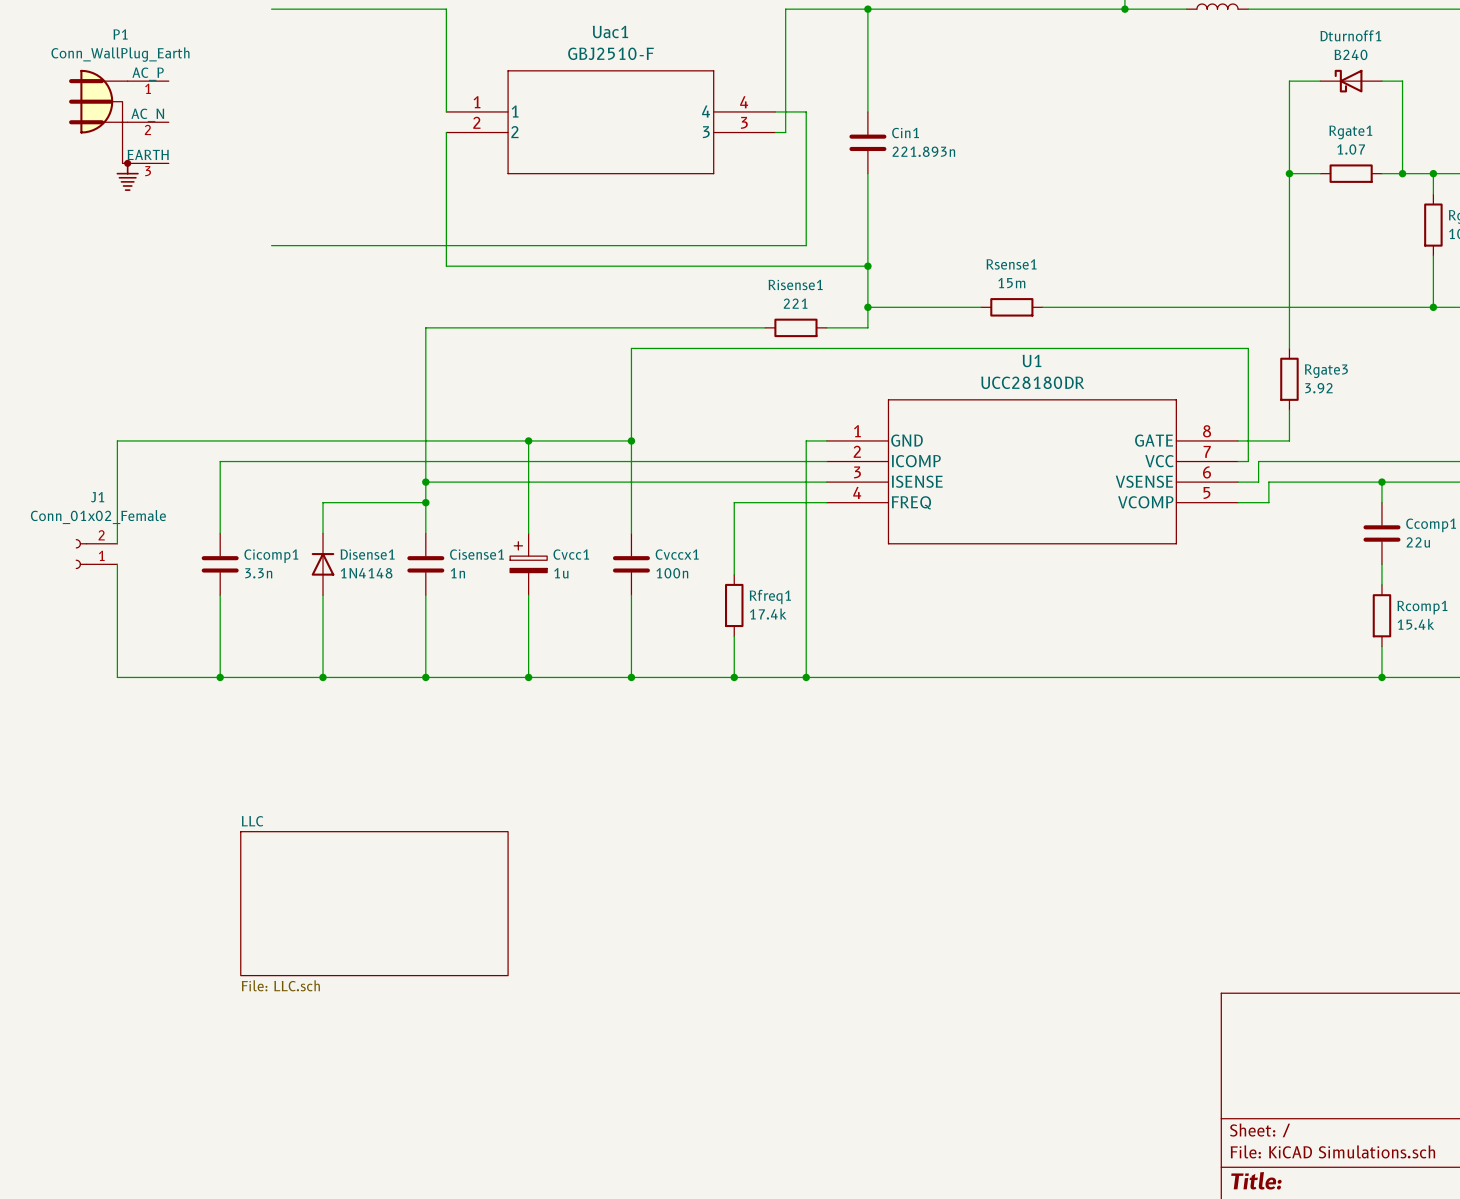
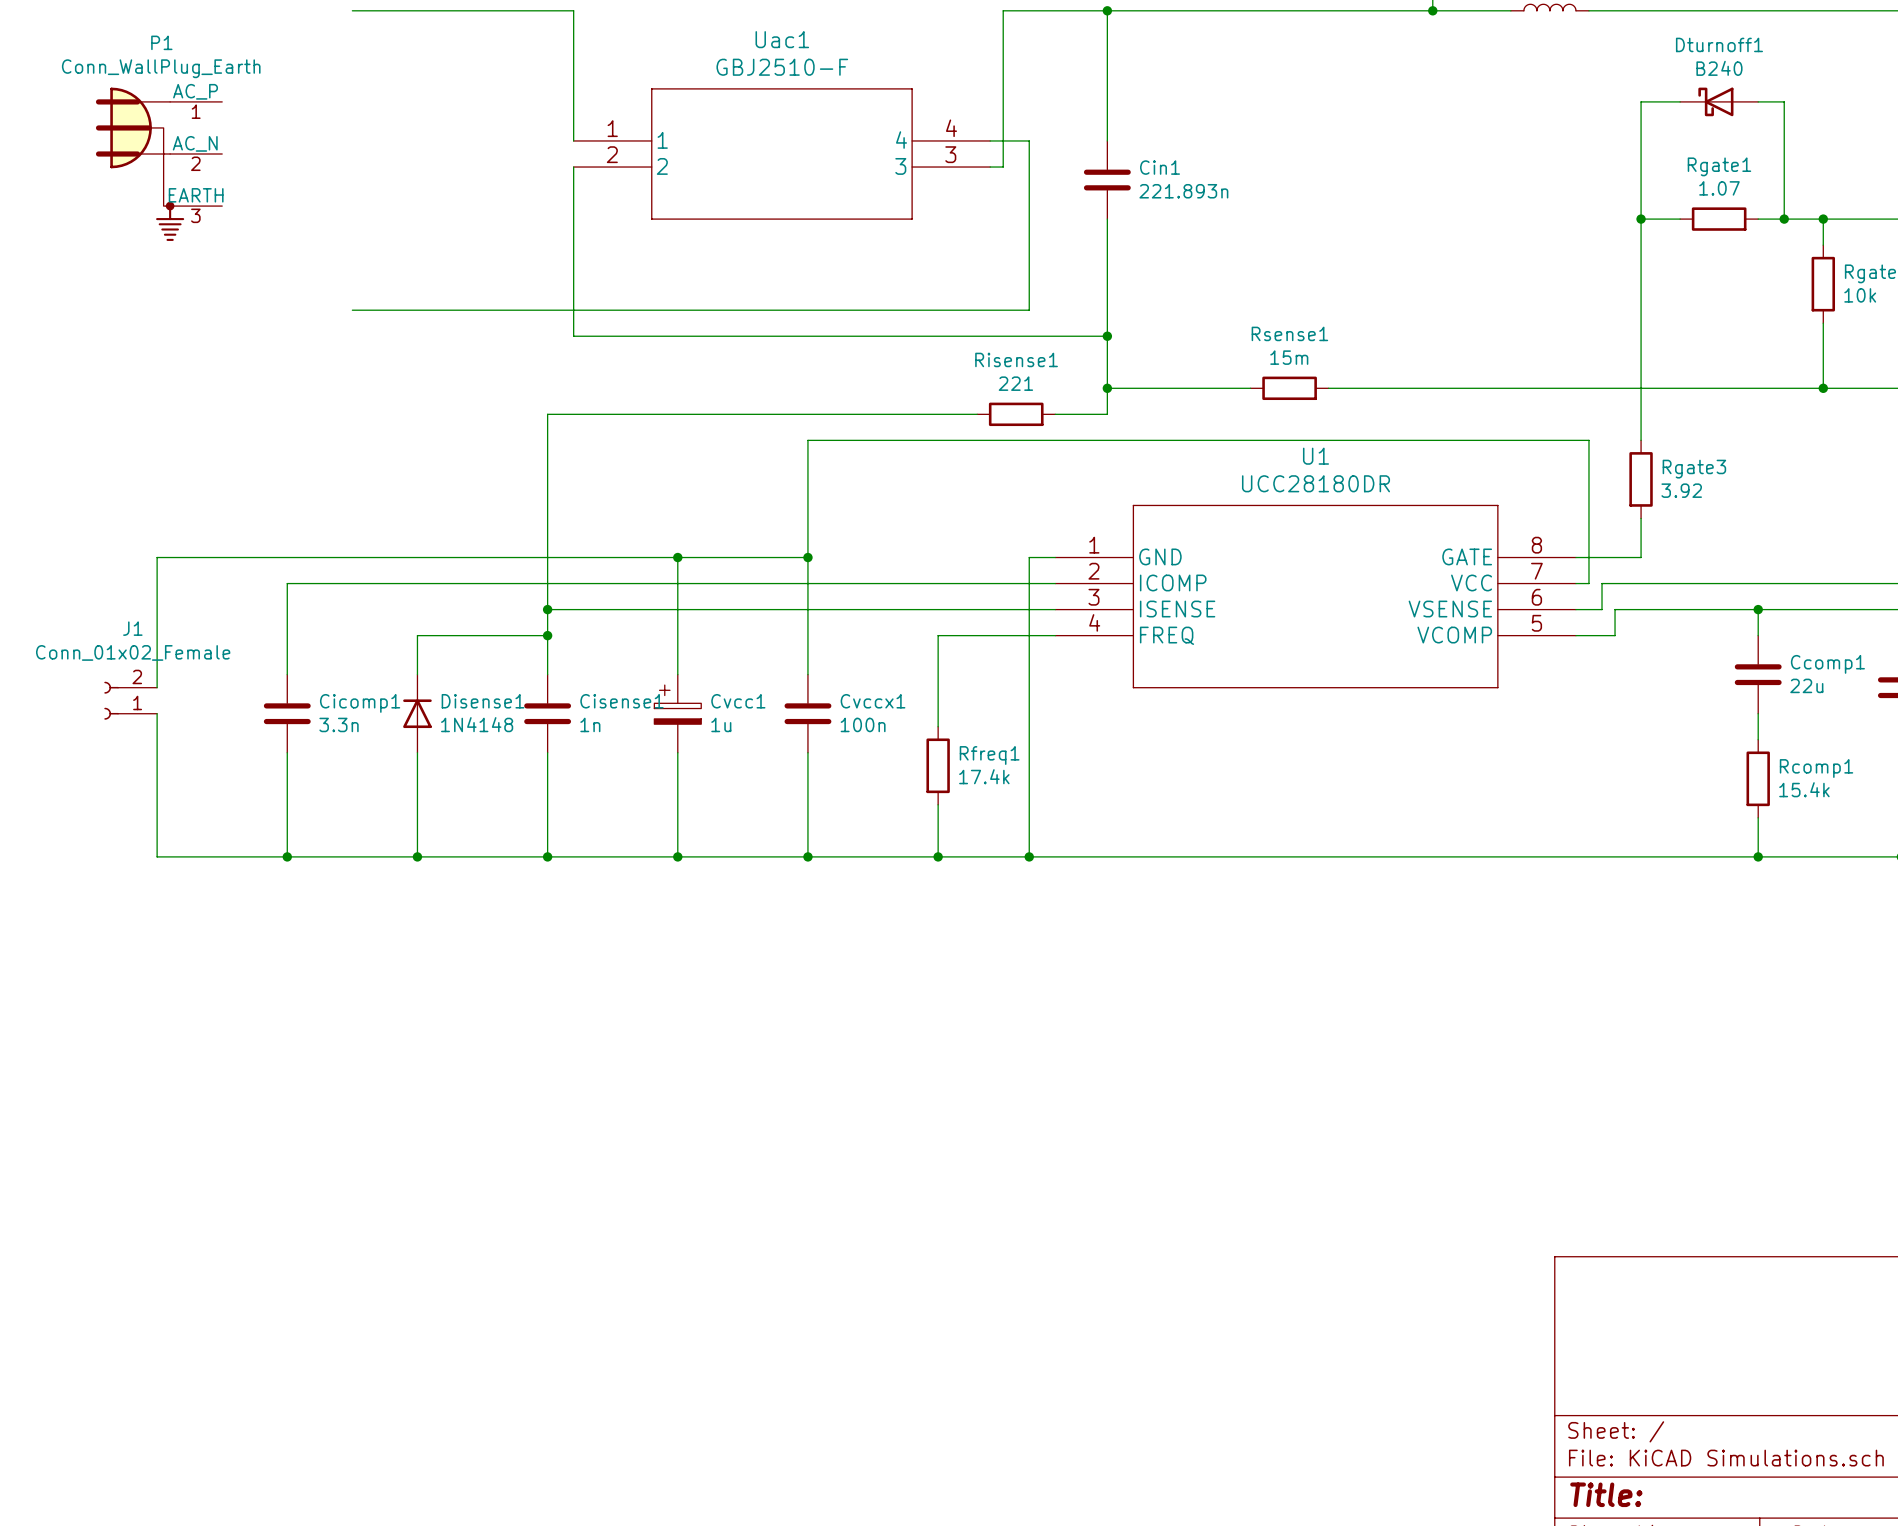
sheet LLC: File: LLC.sch (374, 903) -> none

